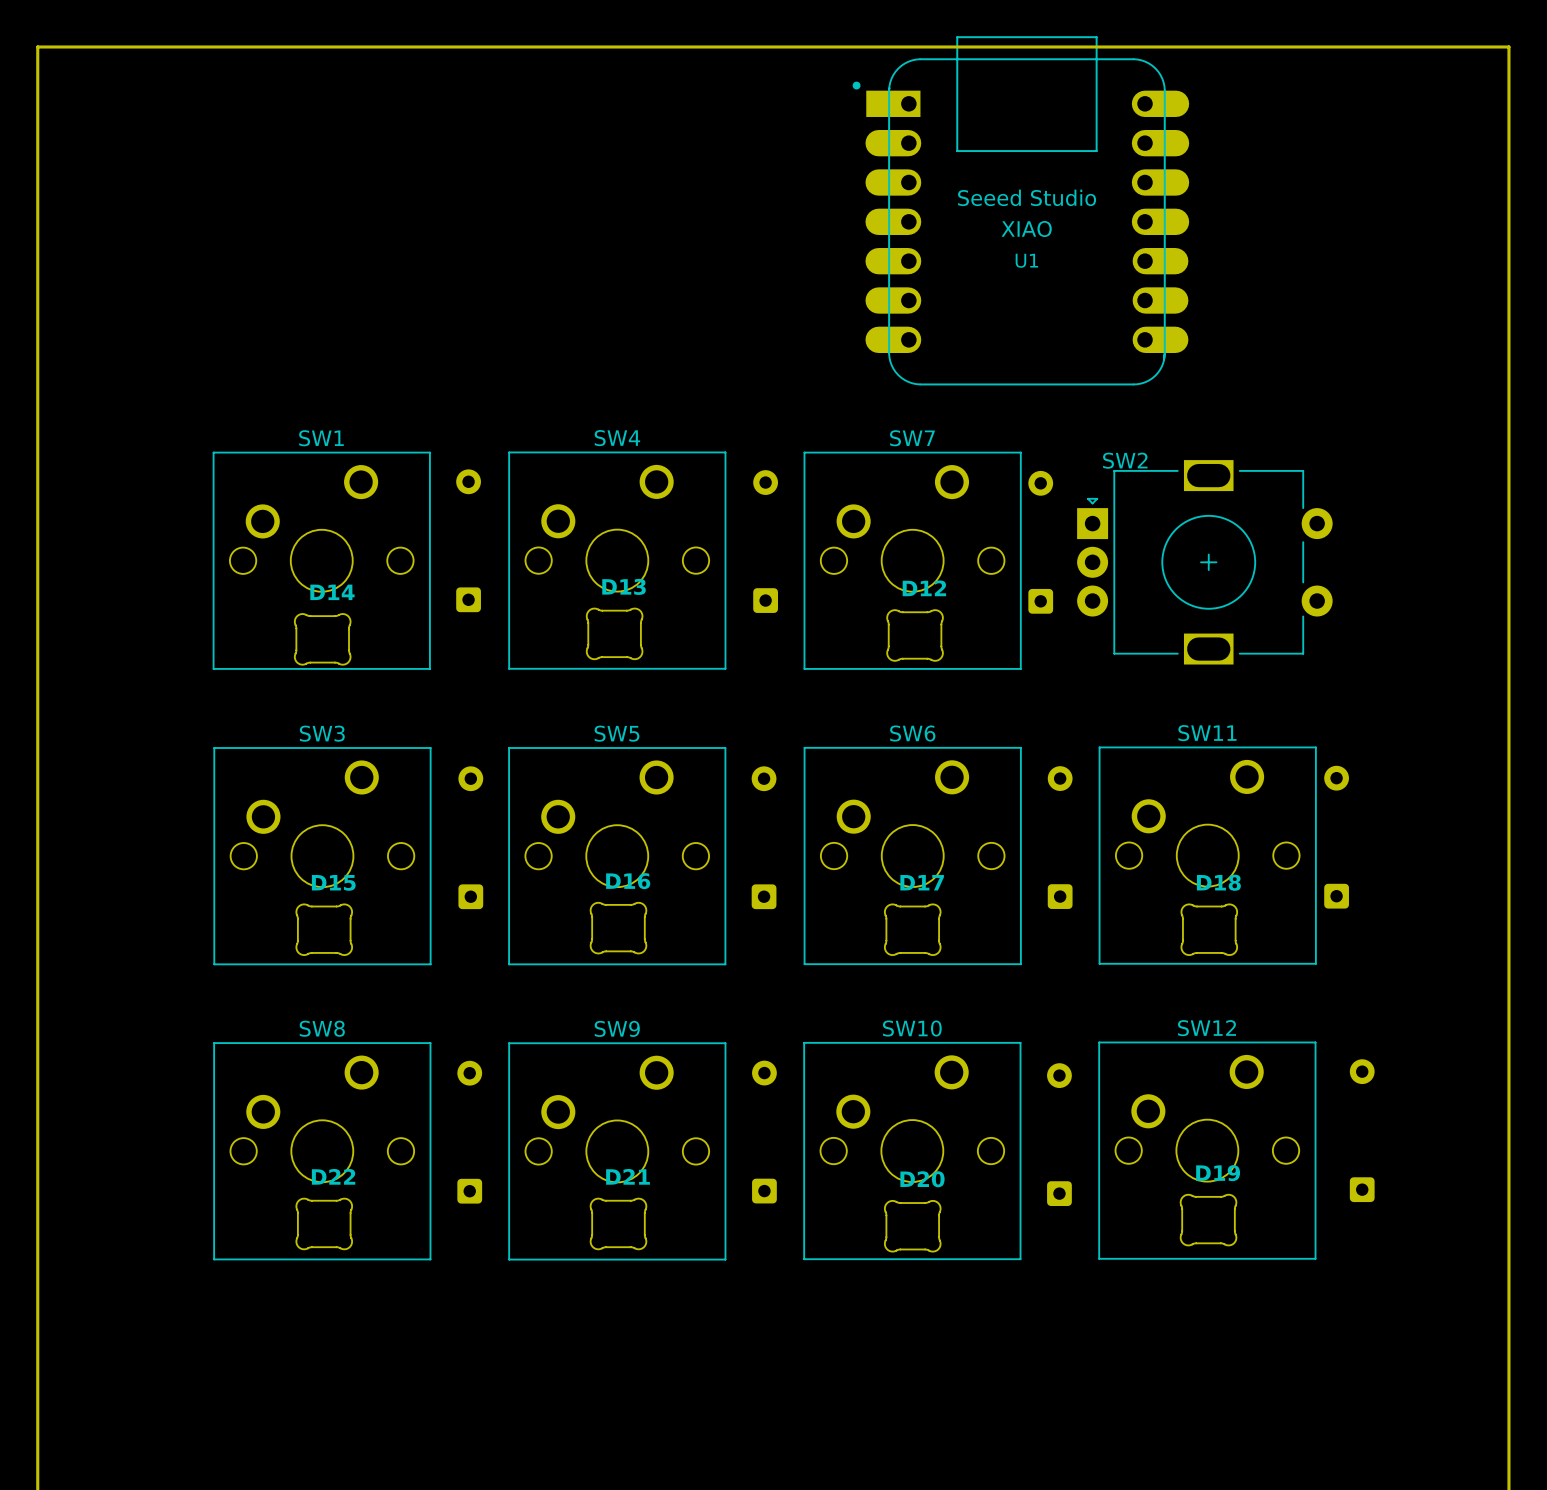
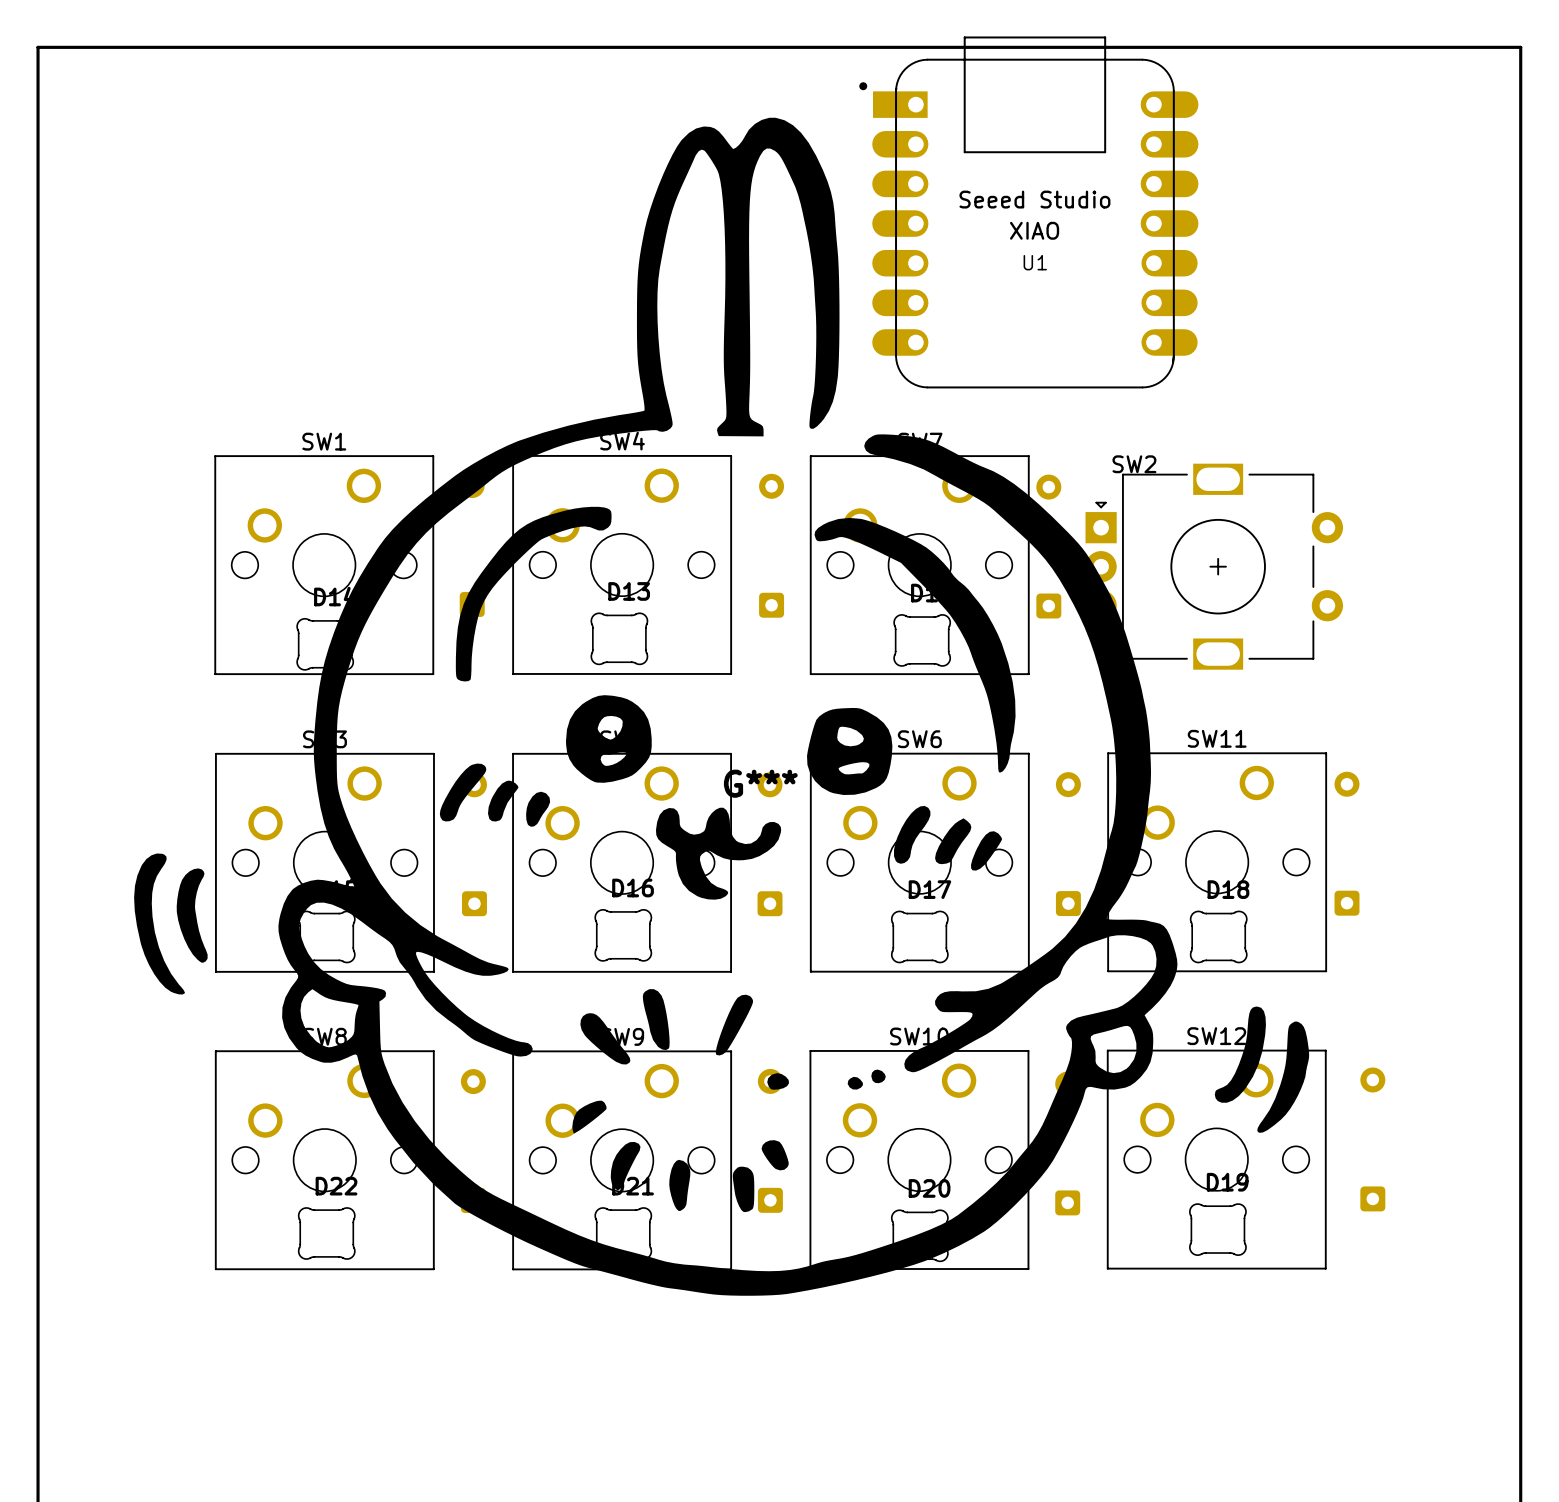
G***: none -> (721, 706)

